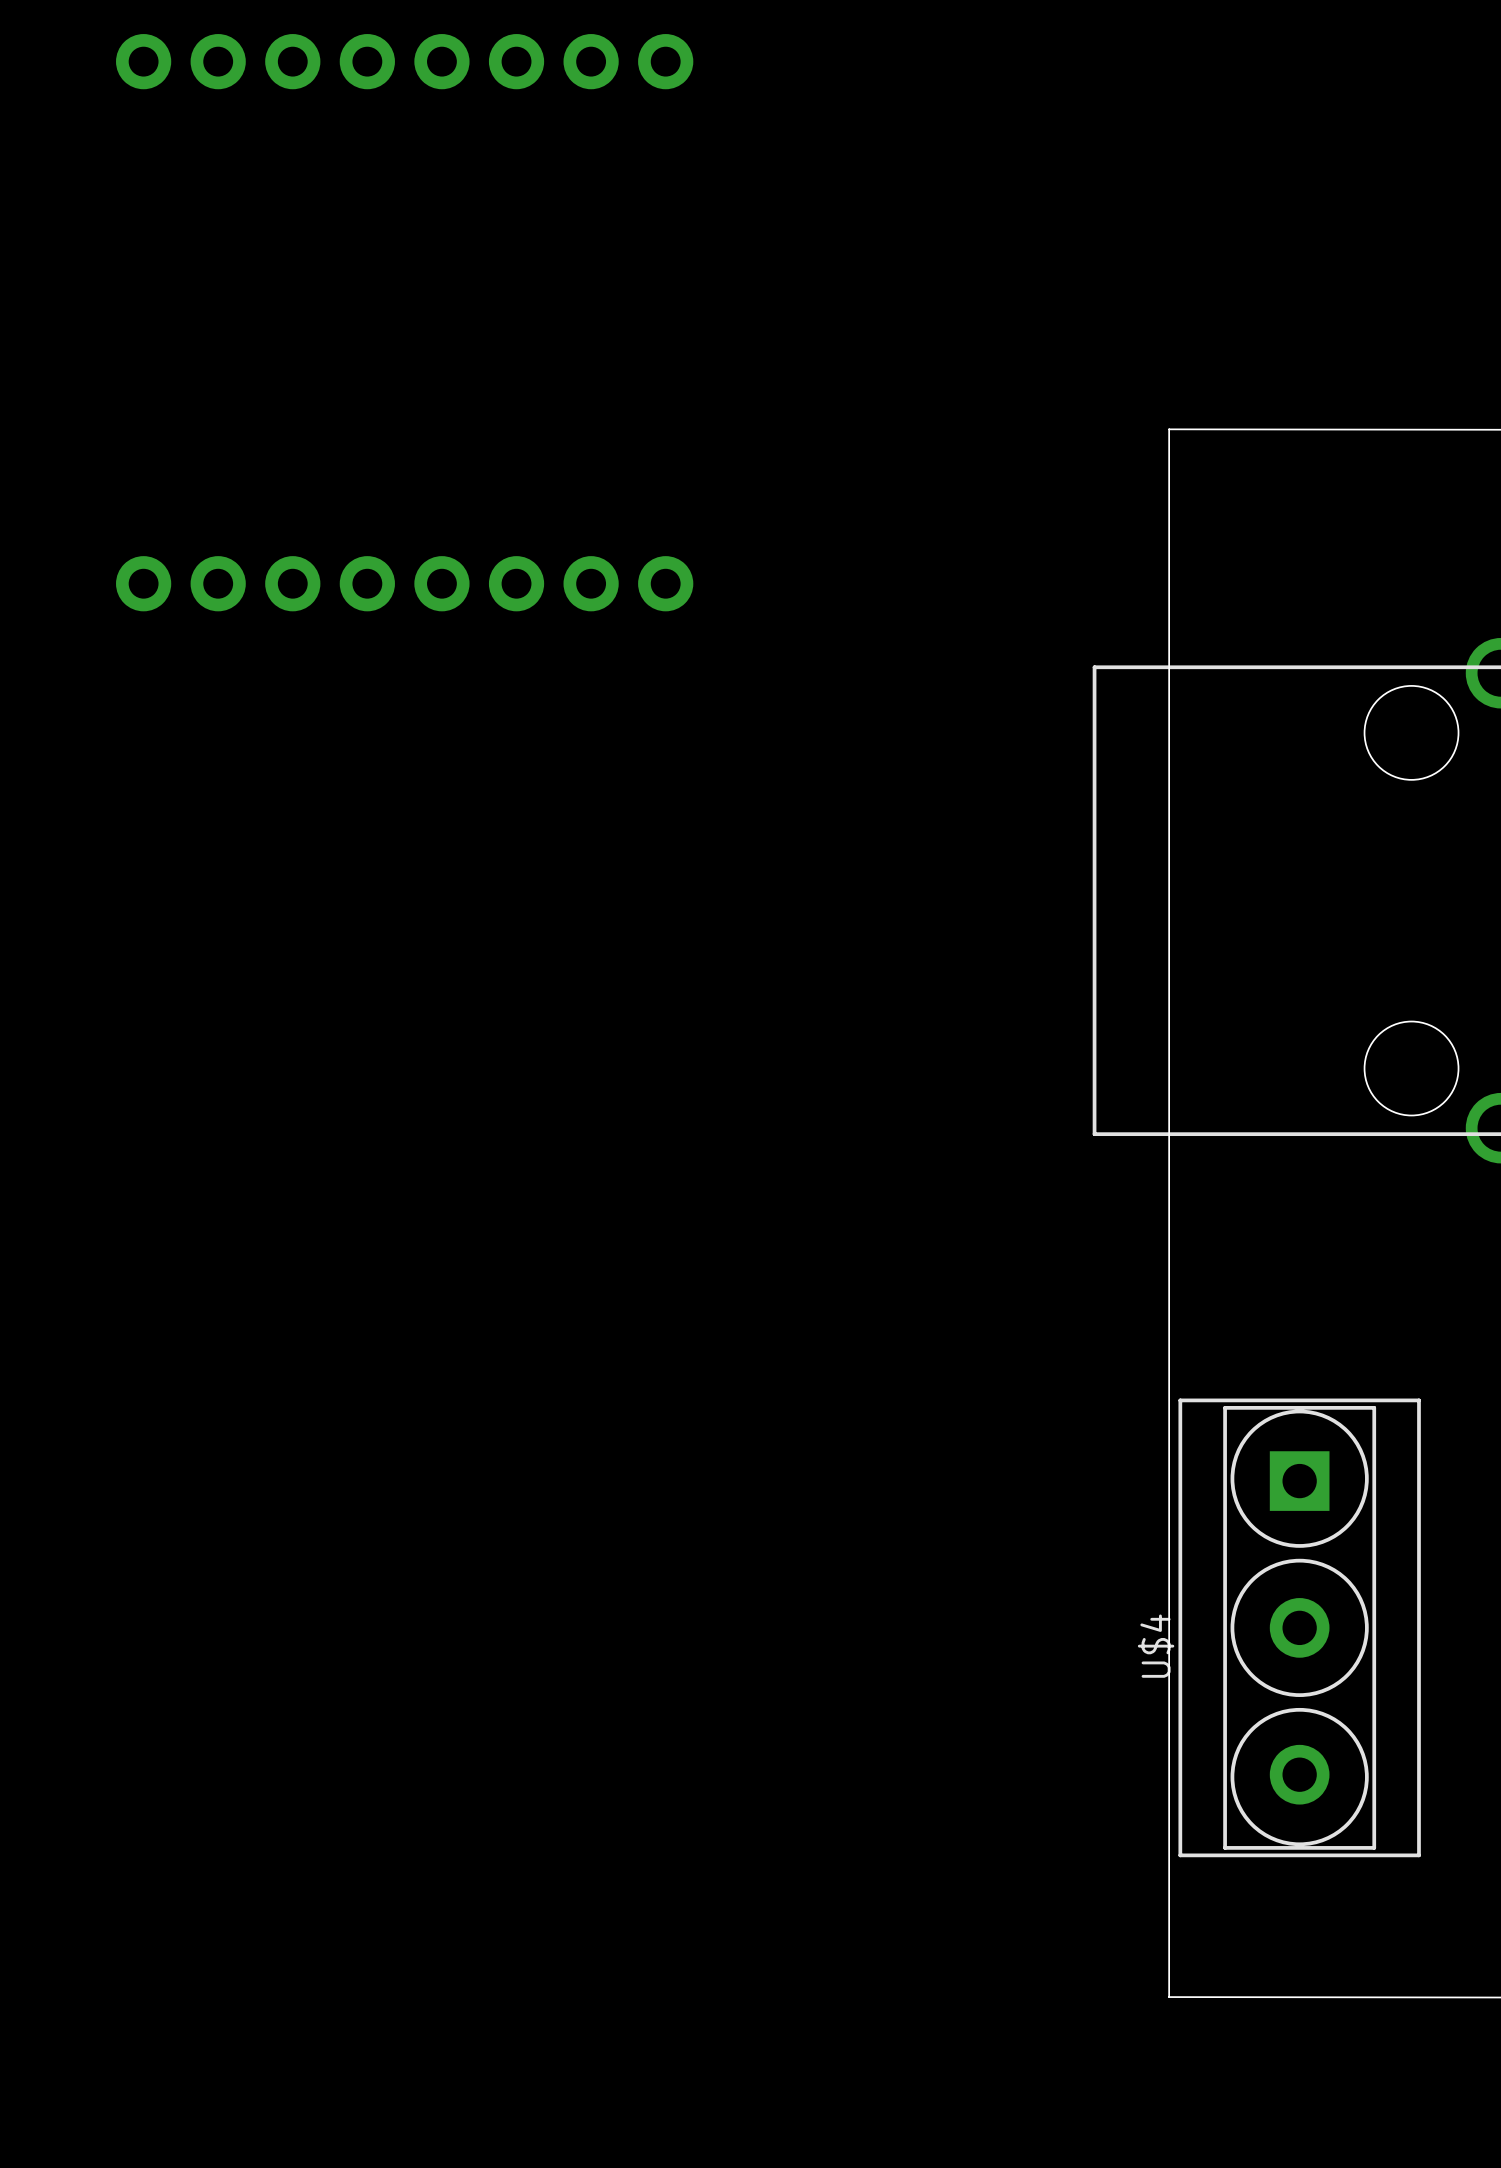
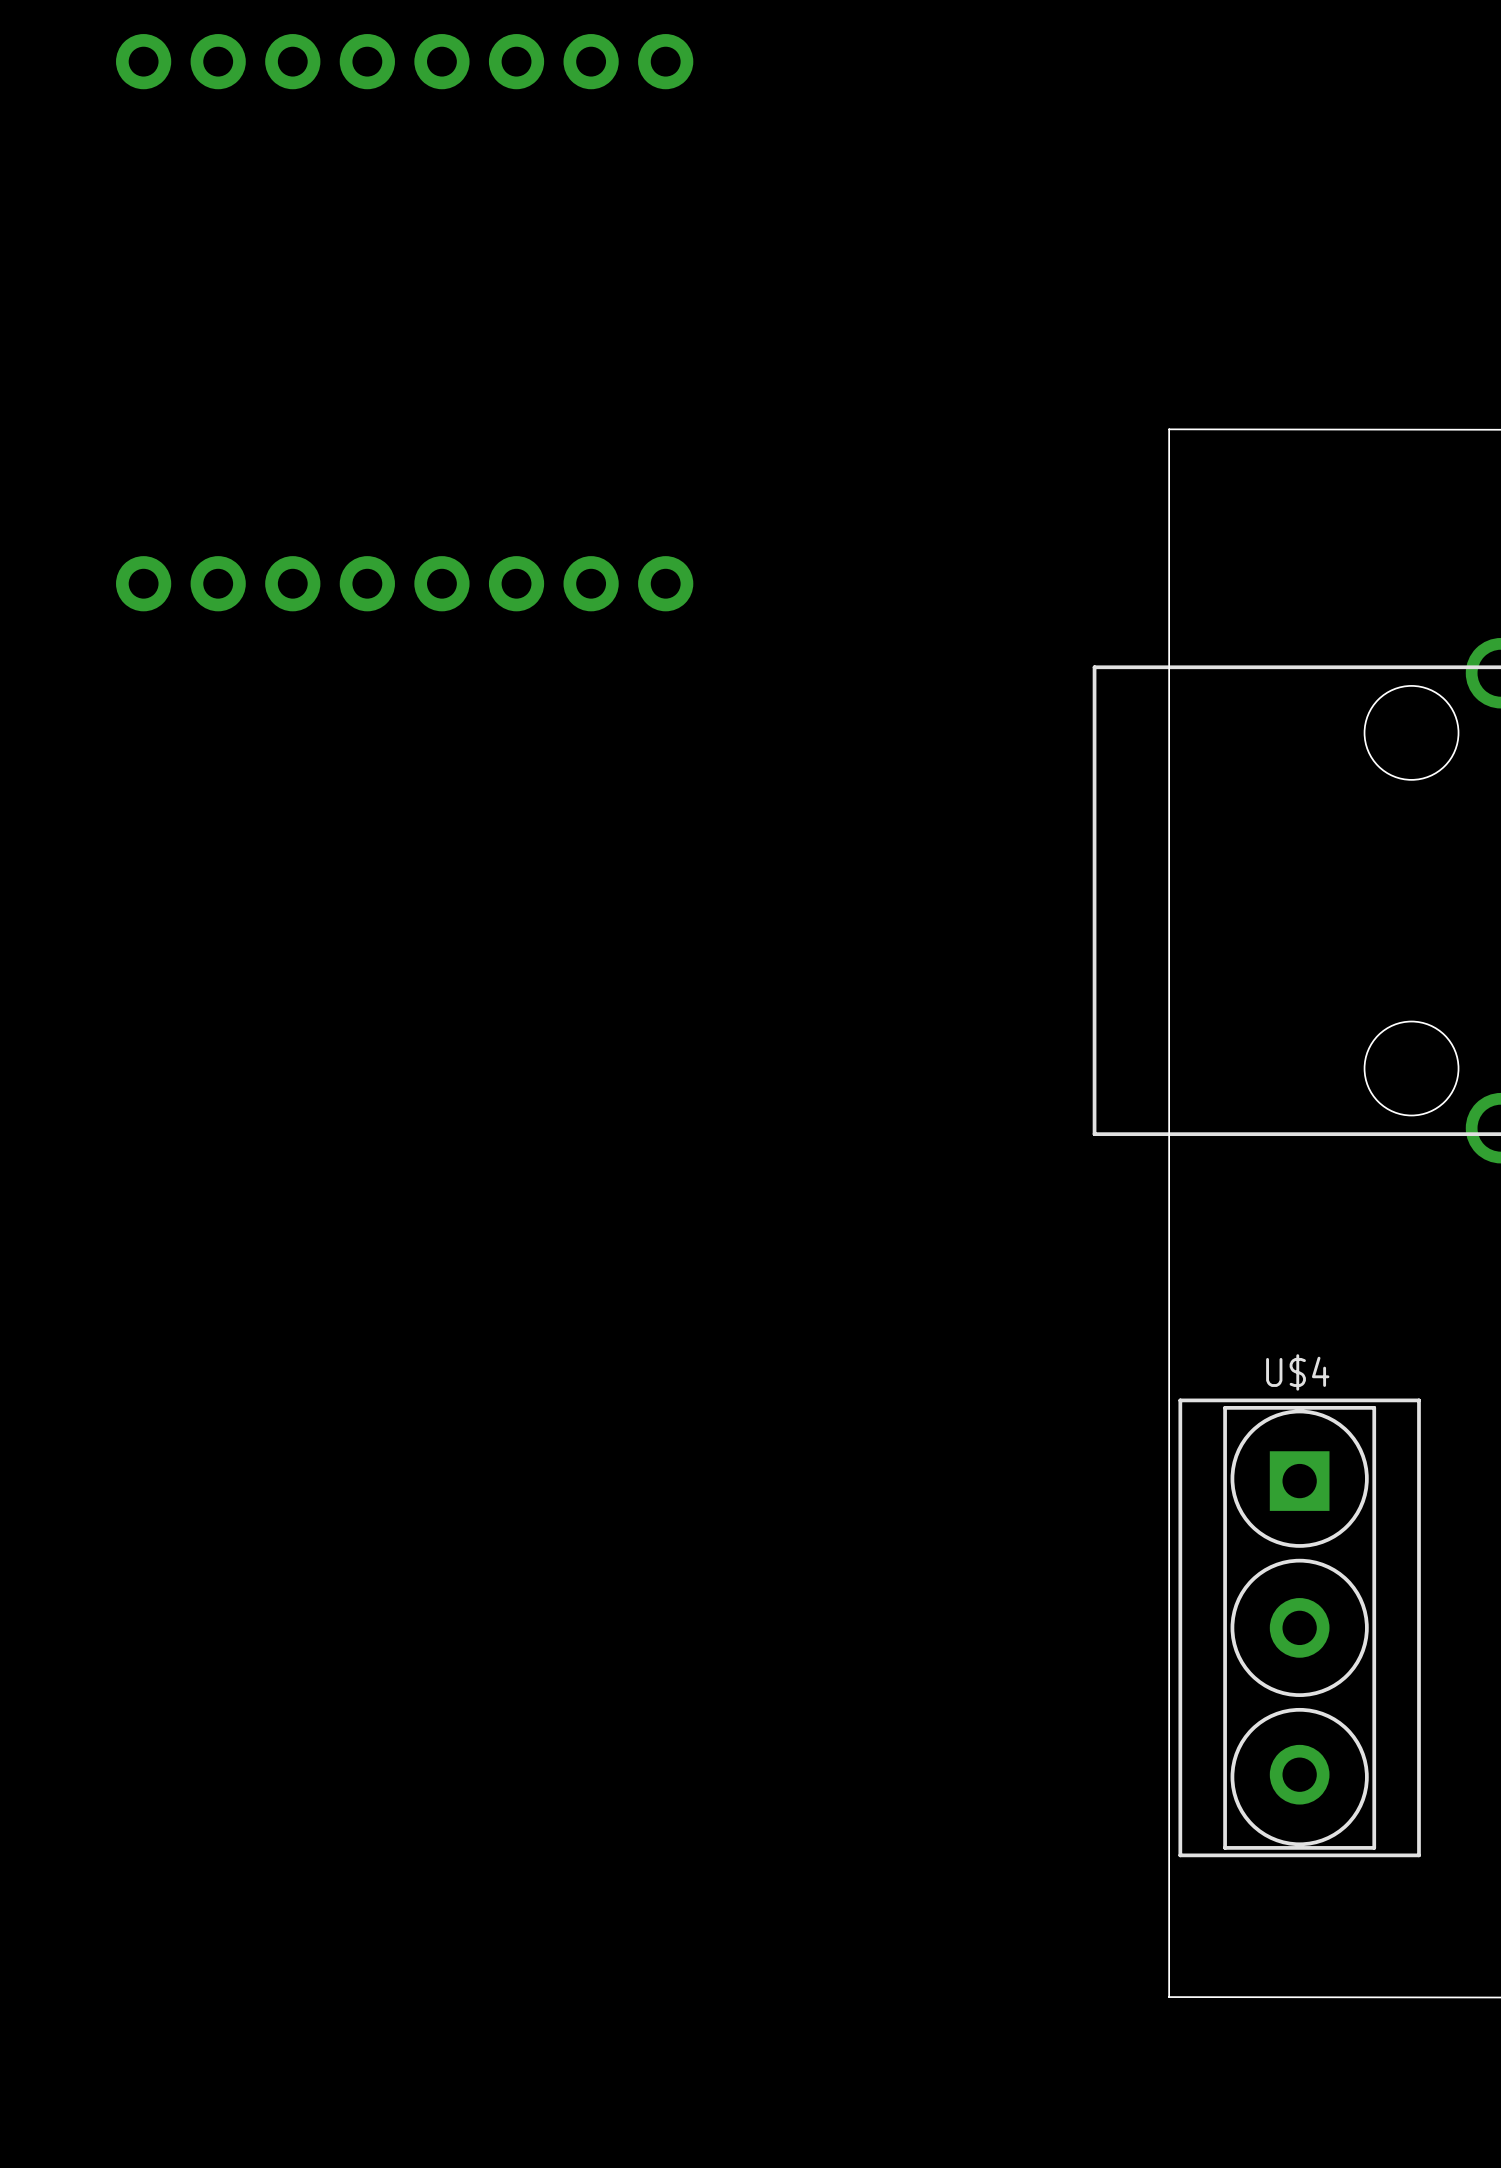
U$4 name rotation: 0° (1156, 1646) -> 90° clockwise (1297, 1372)
U$4 name position: U$4 (1156, 1646) -> U$4 (1297, 1372)

